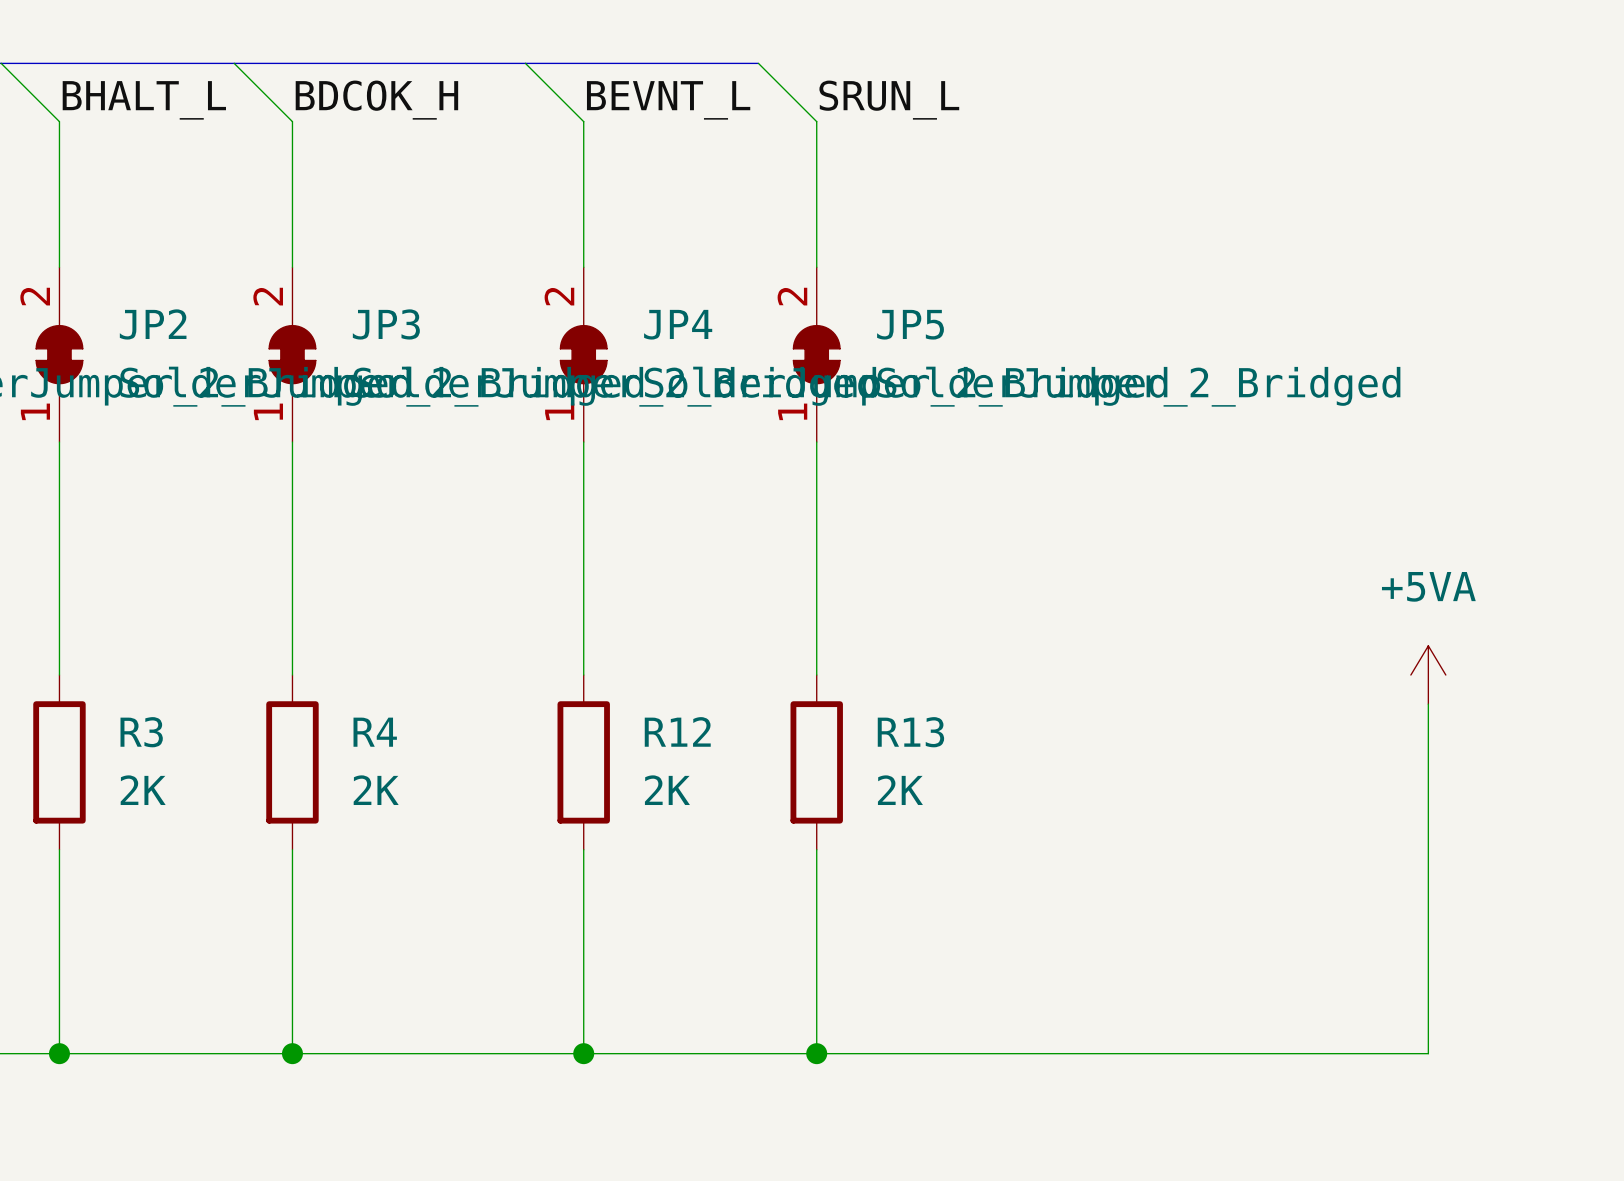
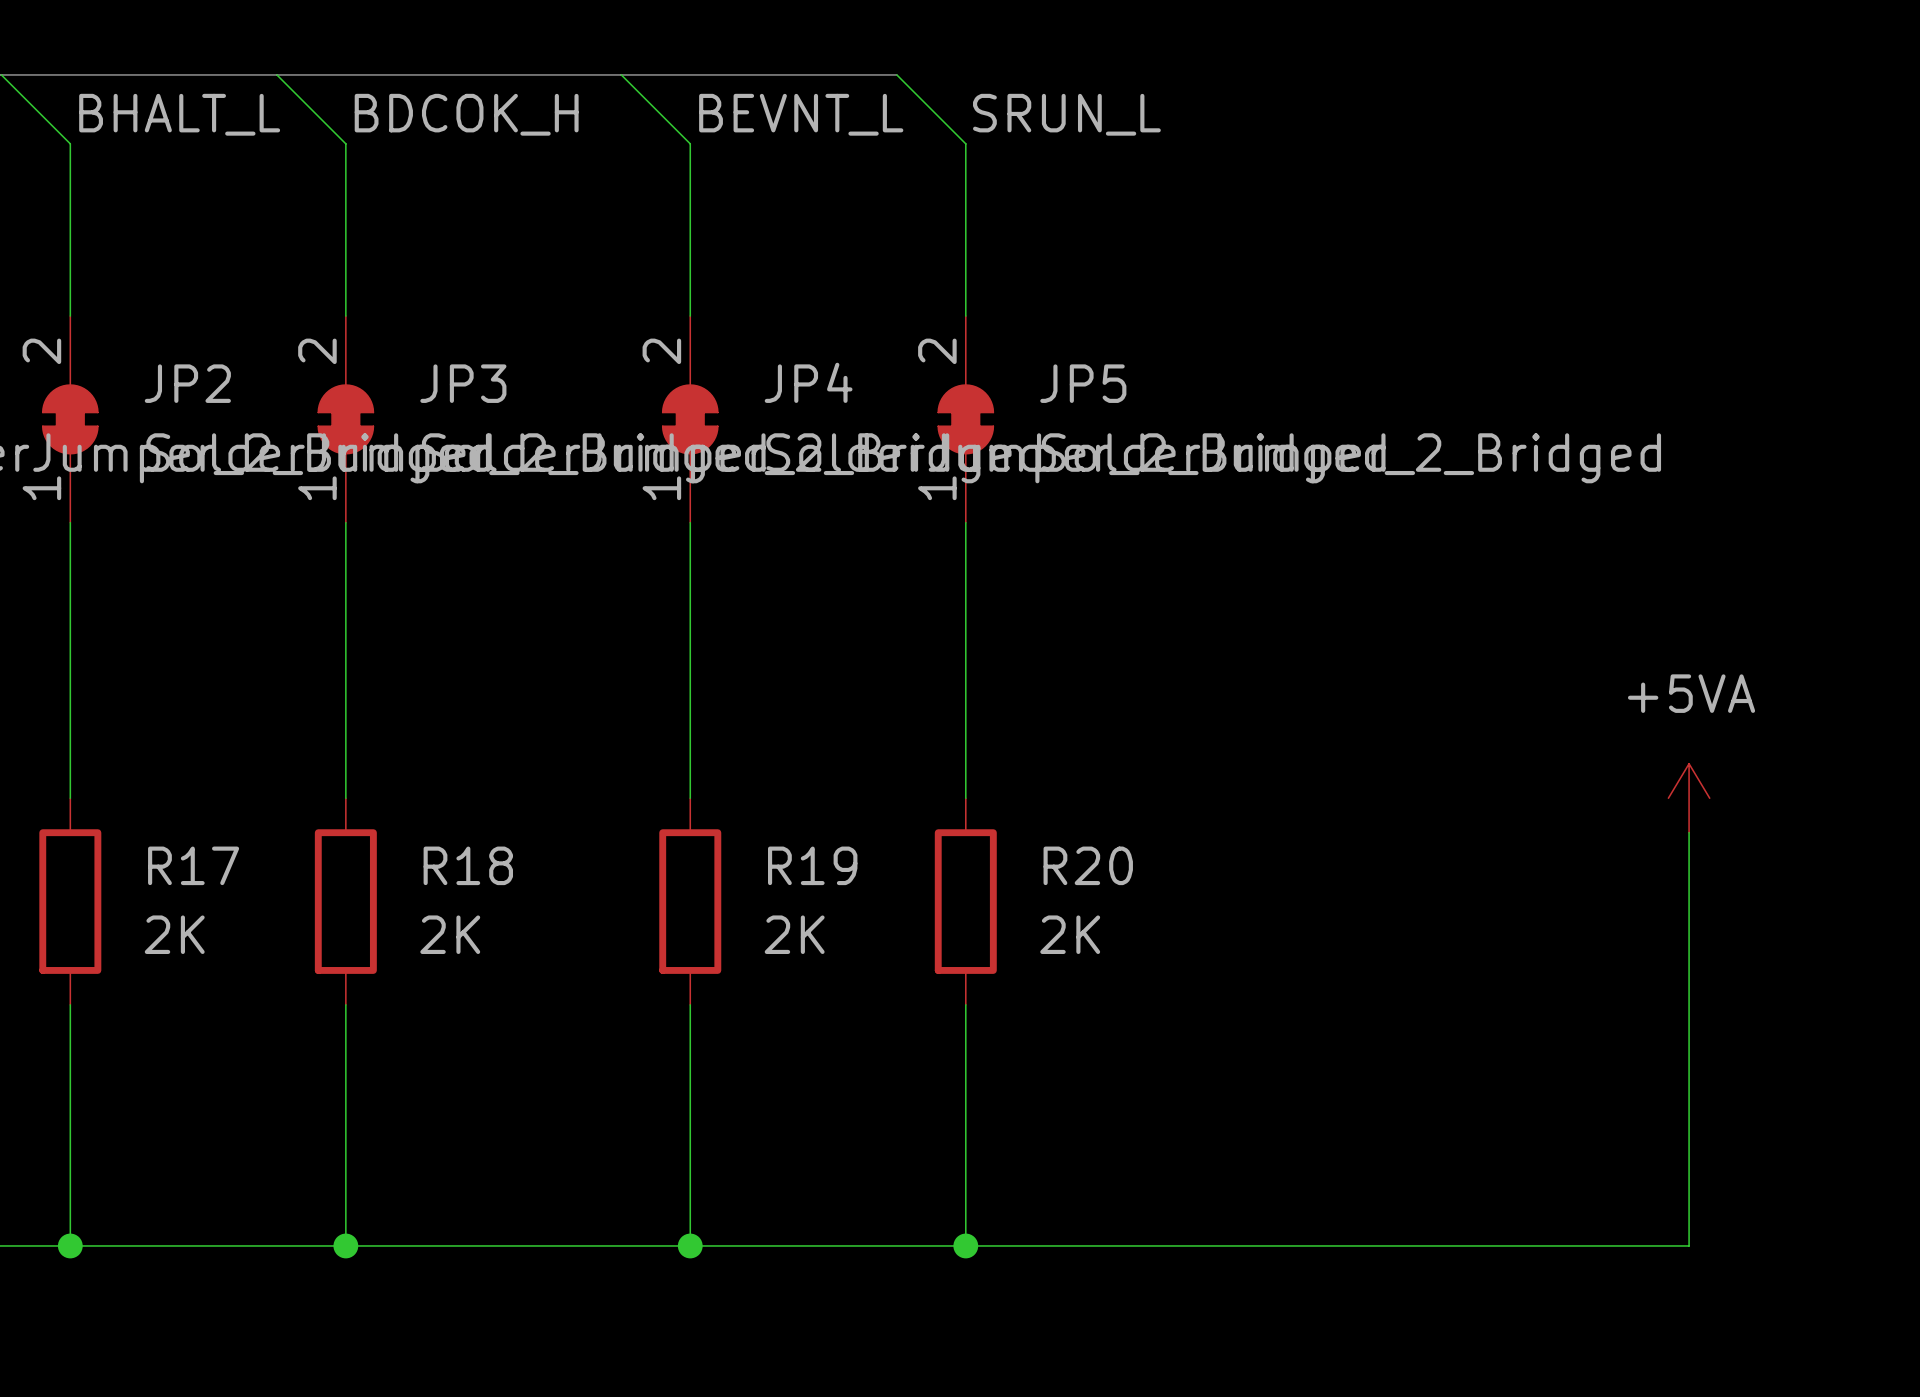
R12 name: R12 (677, 731) -> R19 (812, 865)
R3 name: R3 (141, 732) -> R17 (193, 865)
R4 name: R4 (375, 732) -> R18 (468, 865)
R13 name: R13 (910, 732) -> R20 (1088, 865)

